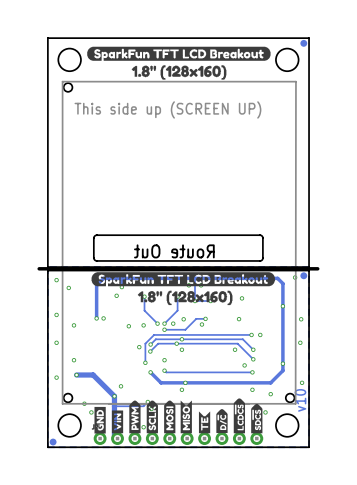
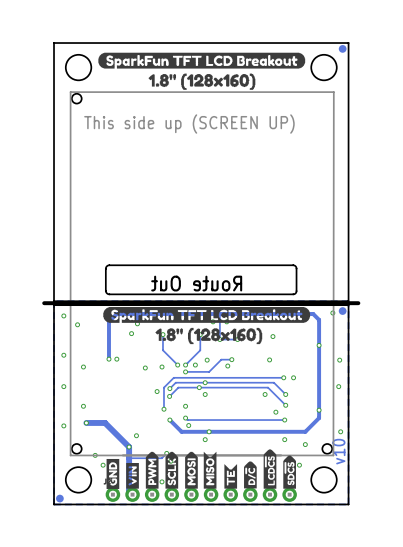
via: none -> (188, 425)

